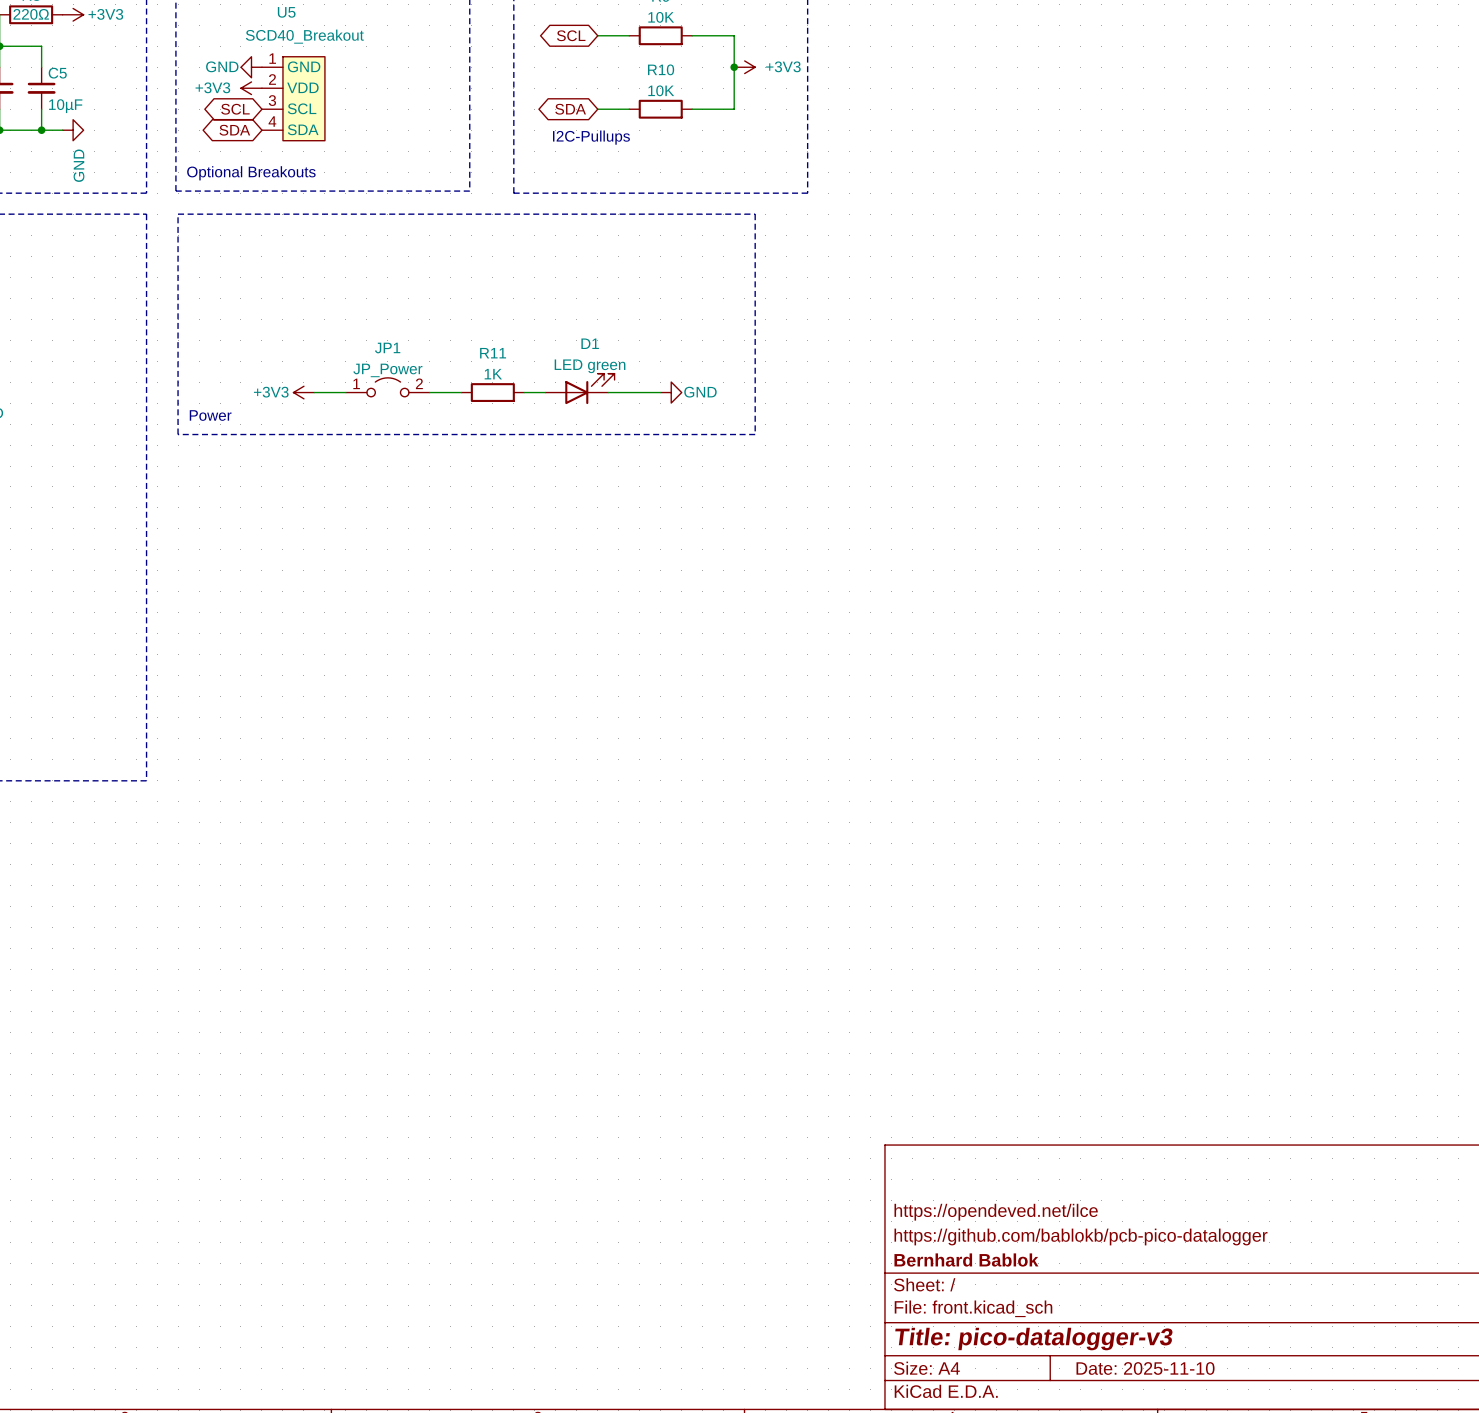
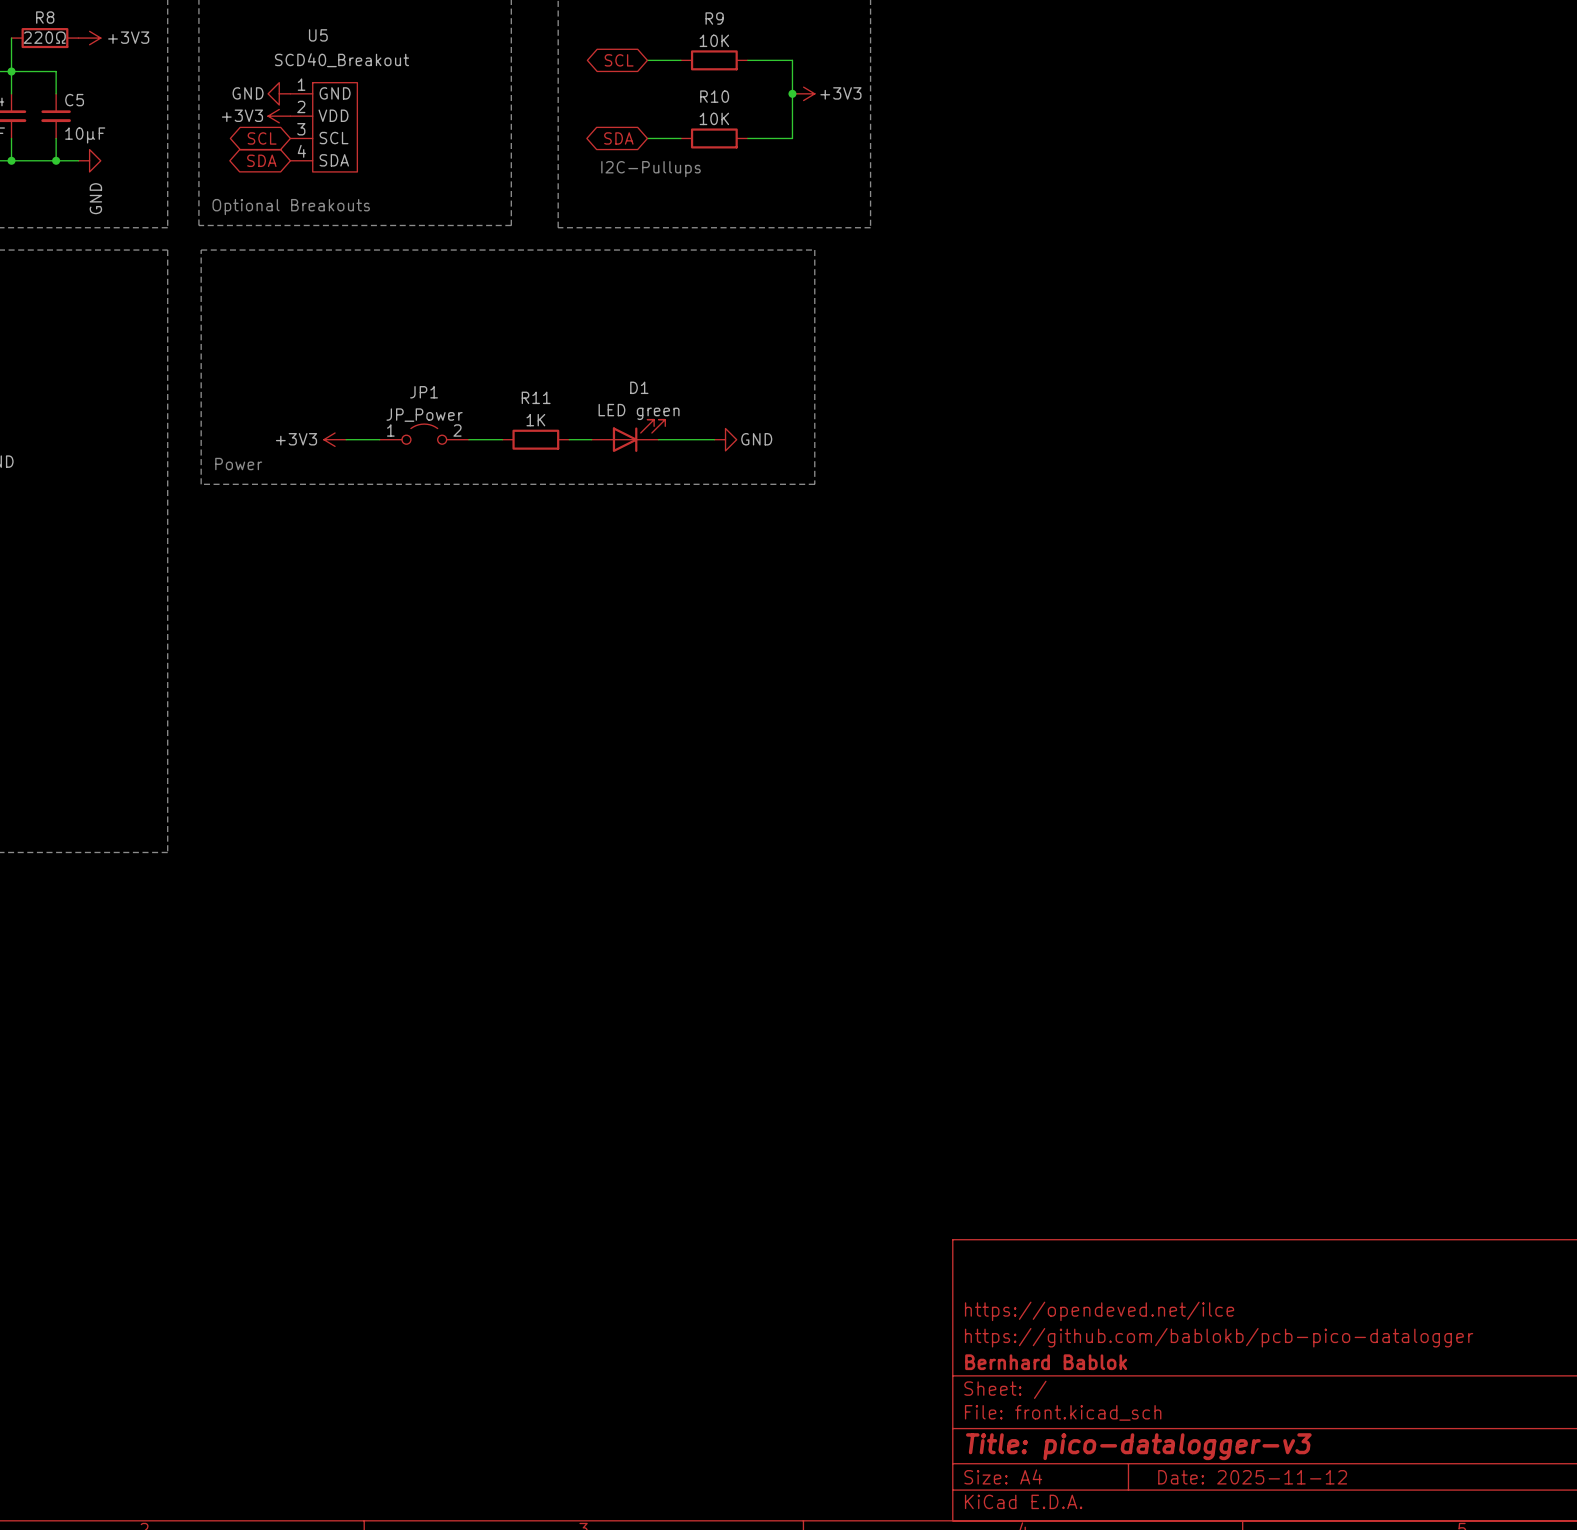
title block: Date: 2025-11-10 (1145, 1368) -> Date: 2025-11-12 (1252, 1477)

